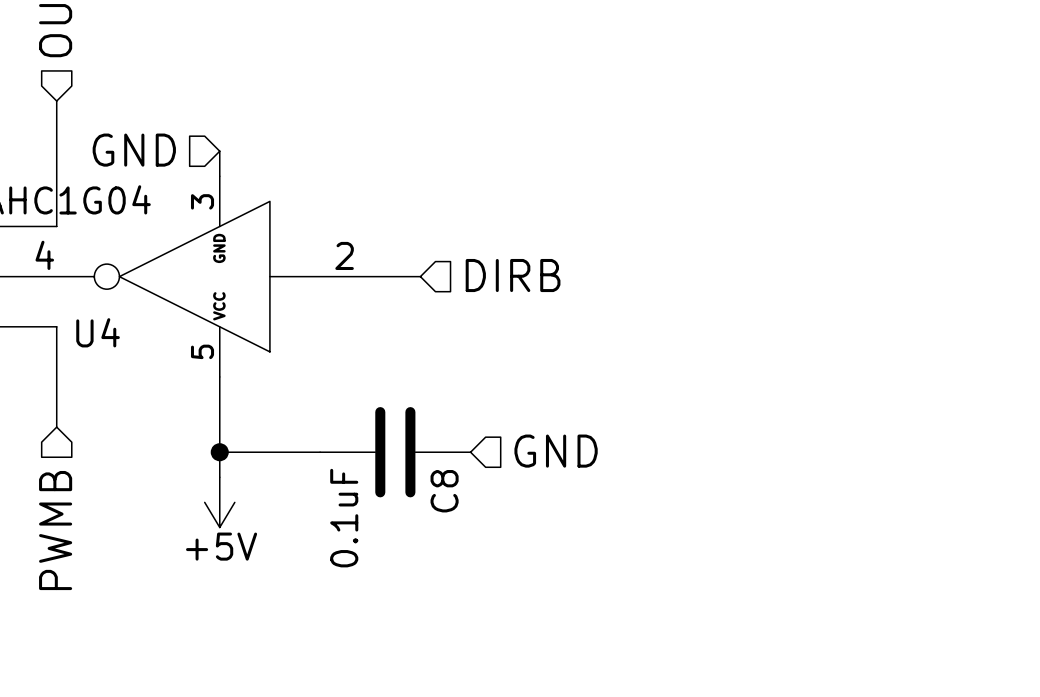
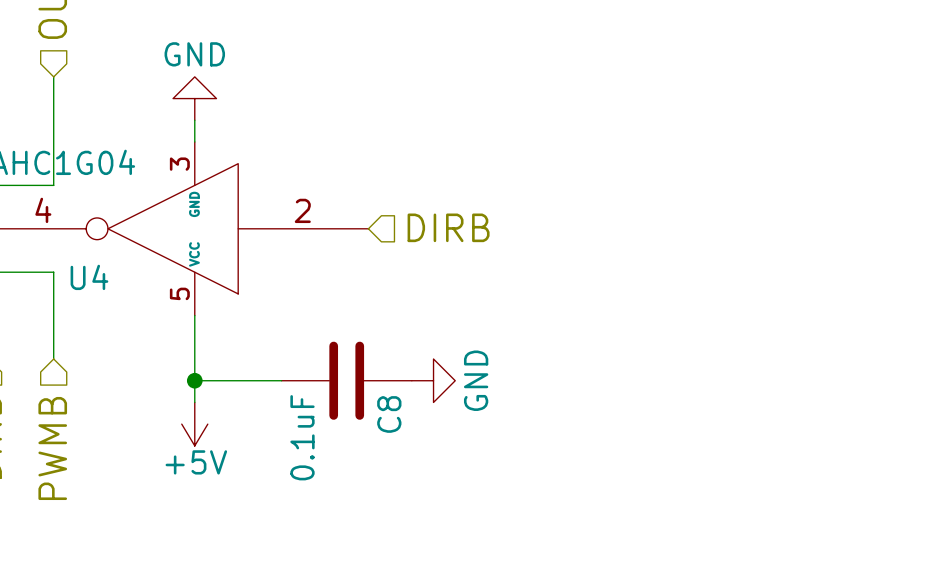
power symbol: none -> GND (194, 98)
hierarchical label: GND (134, 150) -> none
hierarchical label: GND (556, 451) -> none
power symbol: none -> GND (433, 380)

